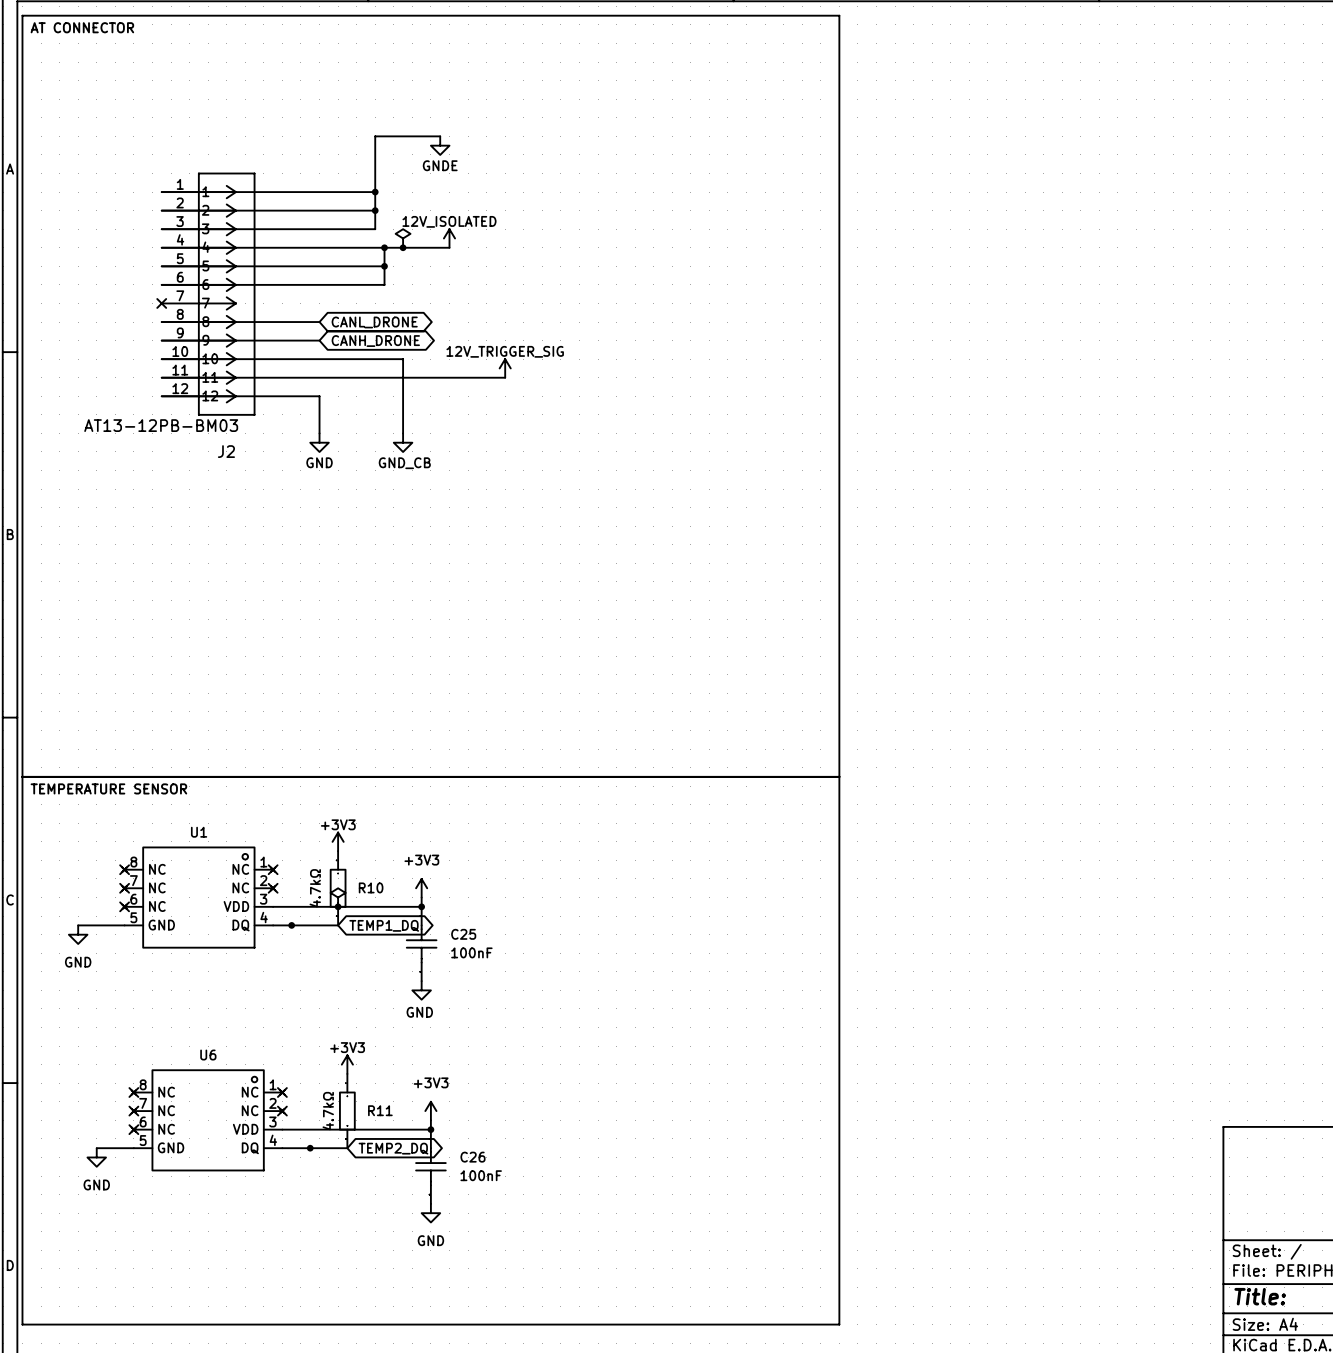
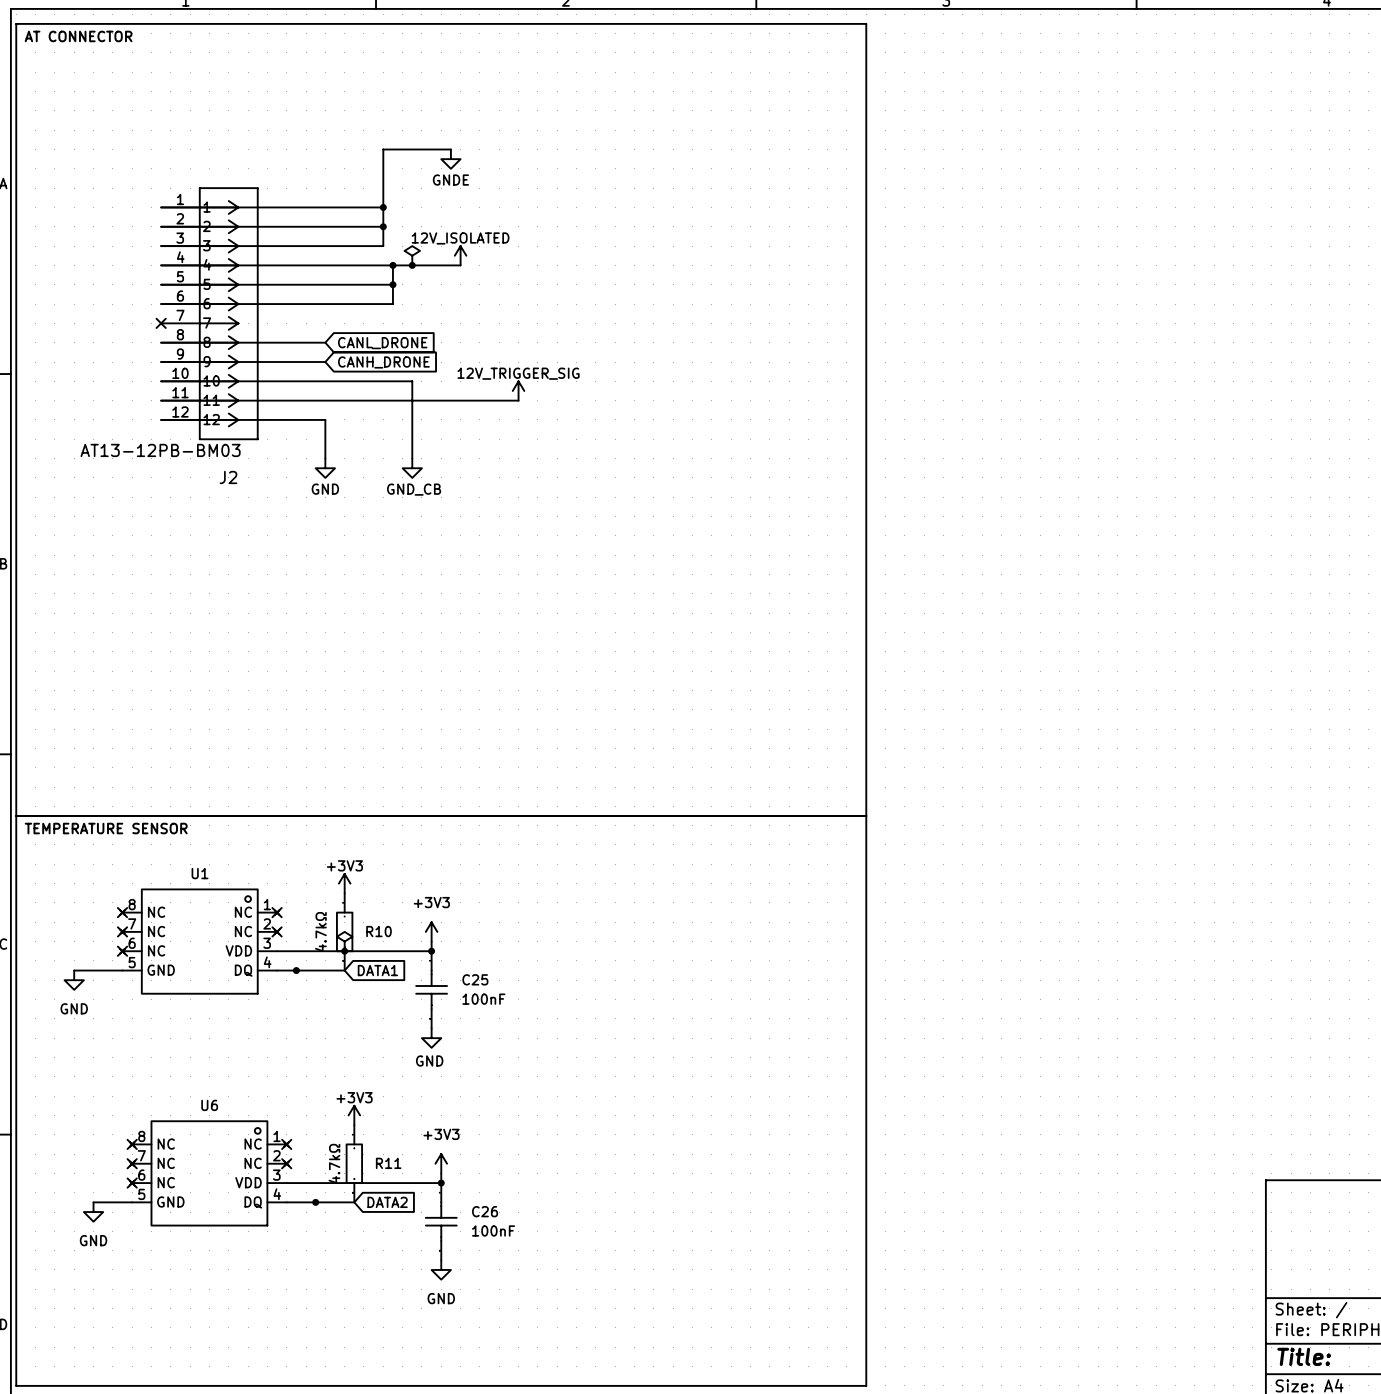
global label shape: bidirectional (374, 322) -> input (382, 343)
global label shape: bidirectional (375, 341) -> input (383, 362)
global label shape: bidirectional (384, 925) -> input (377, 970)
global label: TEMP1_DQ (384, 925) -> DATA1 (377, 970)
global label shape: bidirectional (393, 1148) -> input (387, 1202)
global label: TEMP2_DQ (393, 1148) -> DATA2 (387, 1202)

